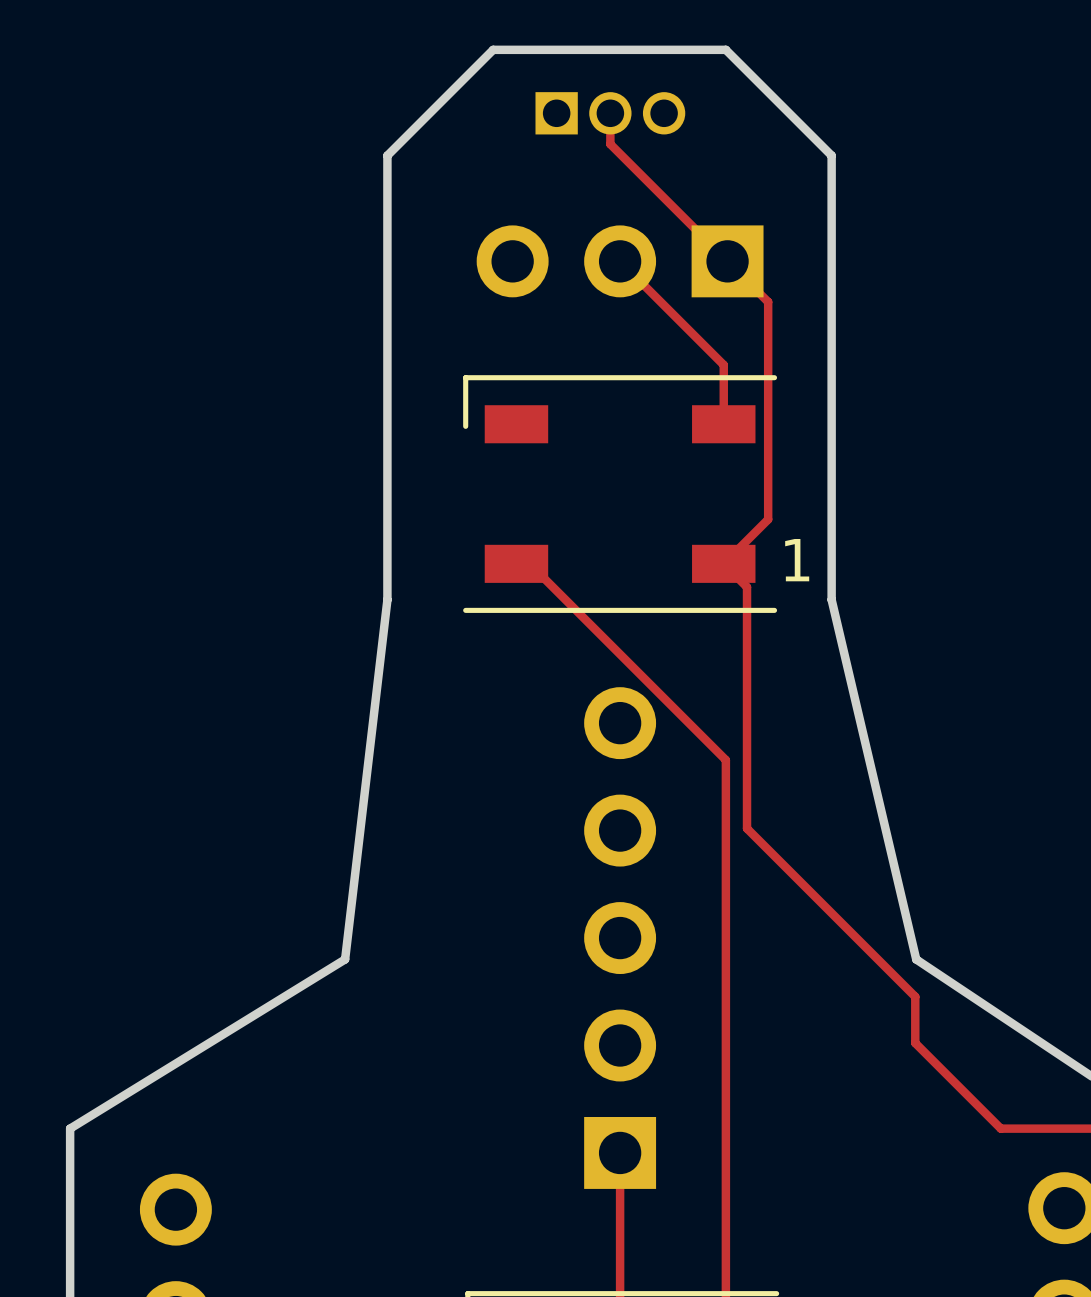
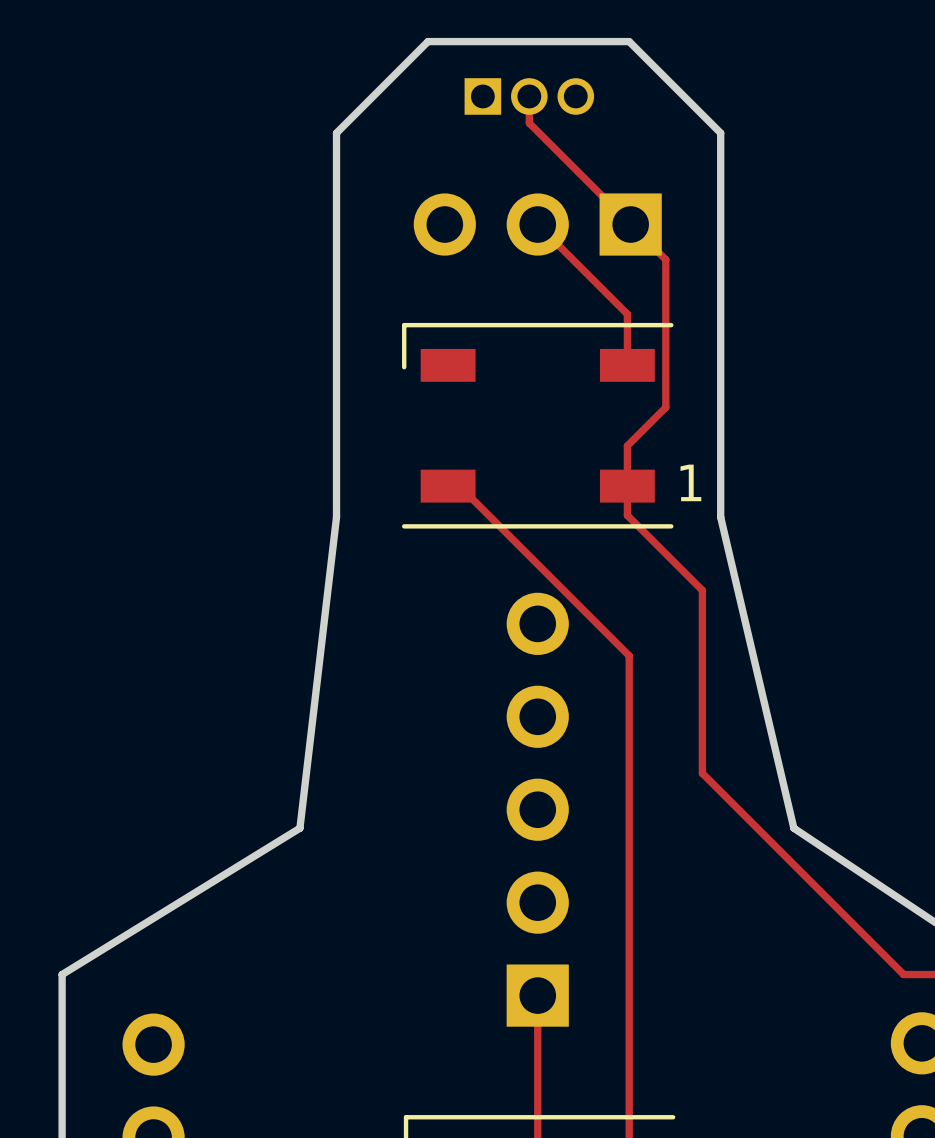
track: (768, 472) (768, 519) (723, 563) (747, 587) (747, 828) (915, 996) (915, 1043) (1000, 1128) (1043, 1128) -> (665, 407) (627, 445) (627, 515) (702, 590) (702, 773) (903, 974)

